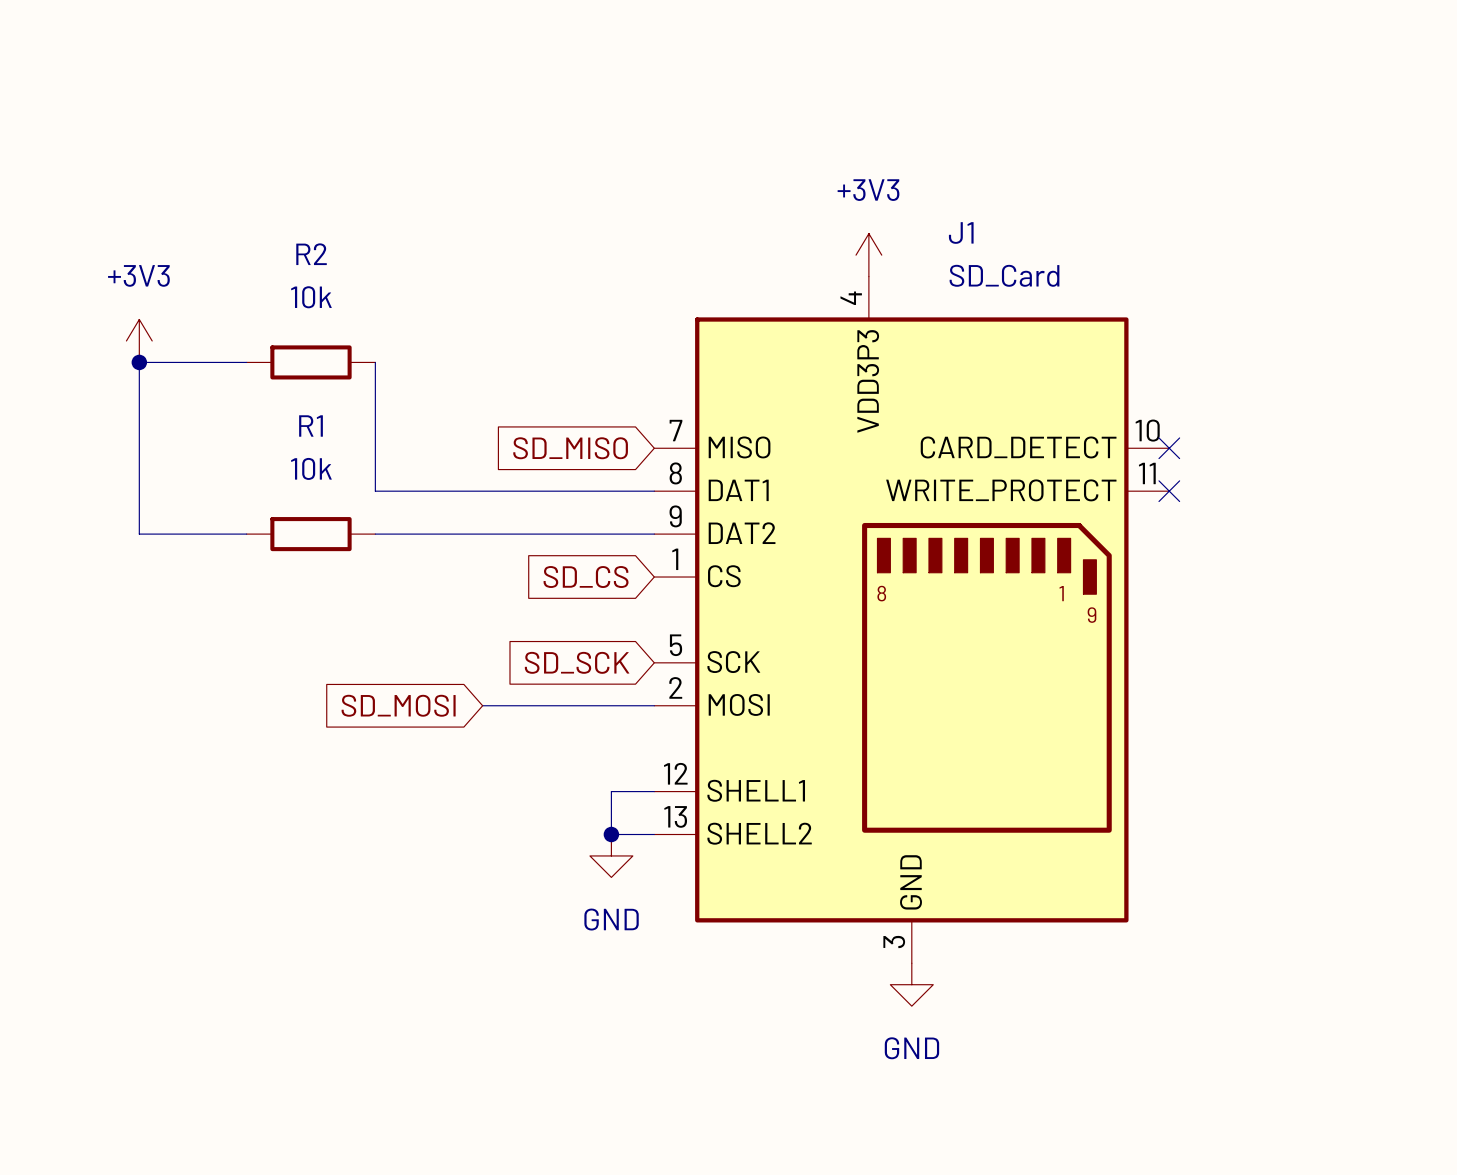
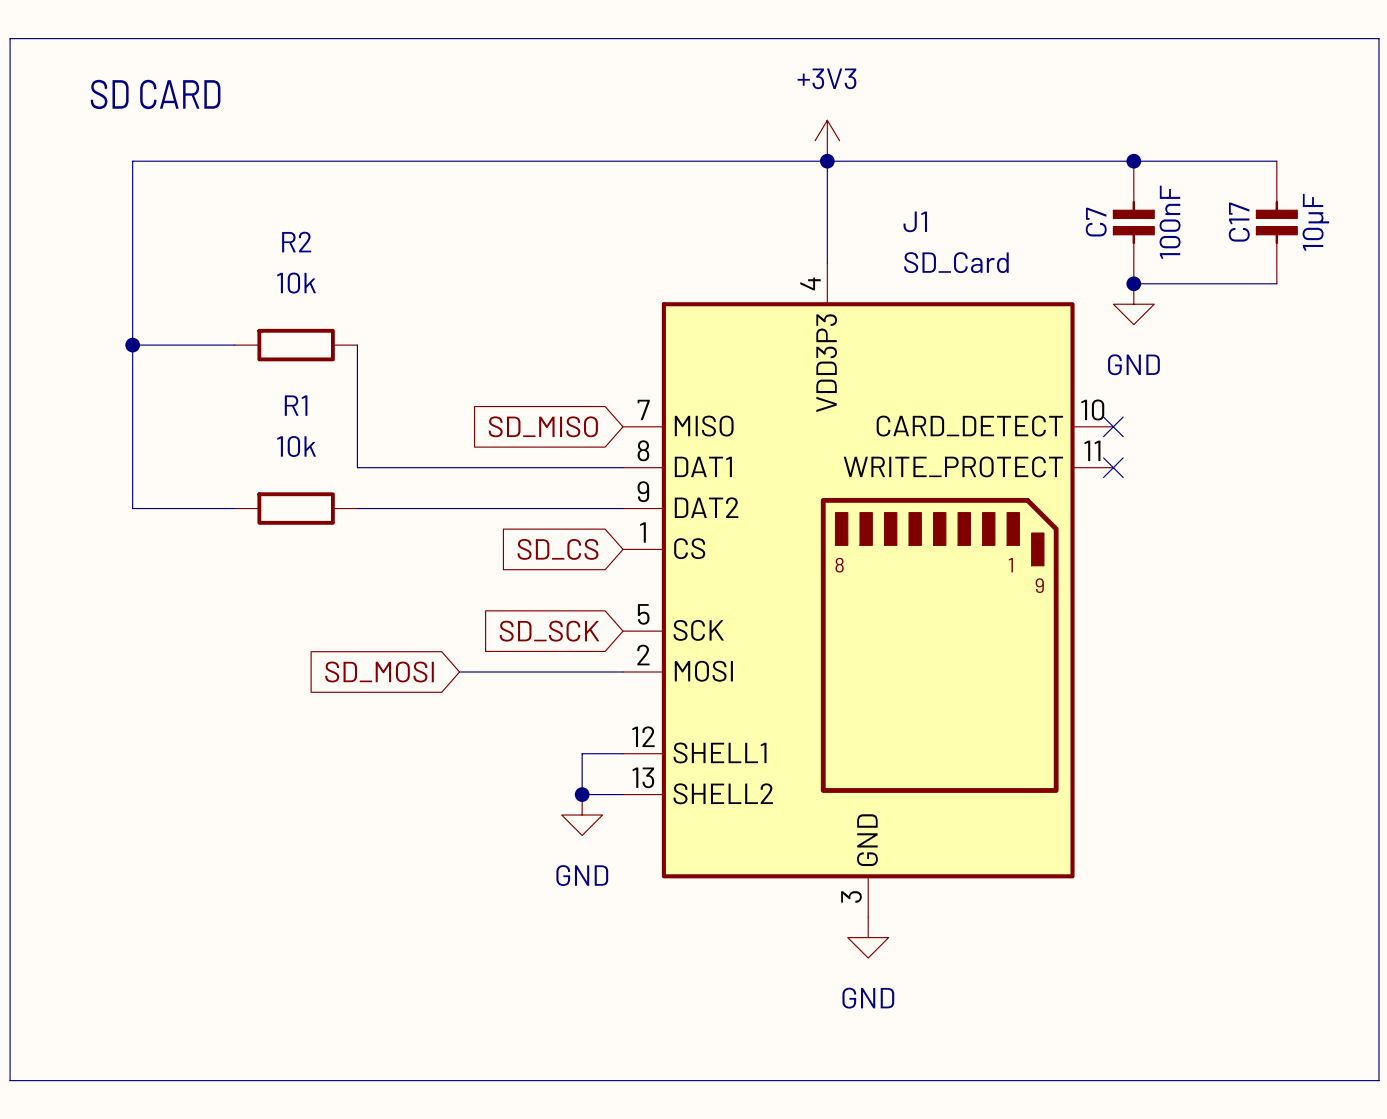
line: none -> (10, 38) (1378, 38) (1378, 1080) (10, 1080) (10, 38)
text: none -> SD CARD (155, 94)
wire: none -> (827, 161) (827, 263)
junction: none -> (827, 161)
junction: none -> (1133, 161)
wire: none -> (1276, 161) (132, 161) (132, 345)
C7: none -> 100nF (1133, 222)
C17: none -> 10µF (1276, 222)
power symbol position: +3V3 (868, 255) -> +3V3 (827, 140)
wire: none -> (1133, 283) (1276, 283)
junction: none -> (1133, 283)
power symbol: none -> GND (1133, 304)
power symbol: +3V3 (139, 340) -> none

